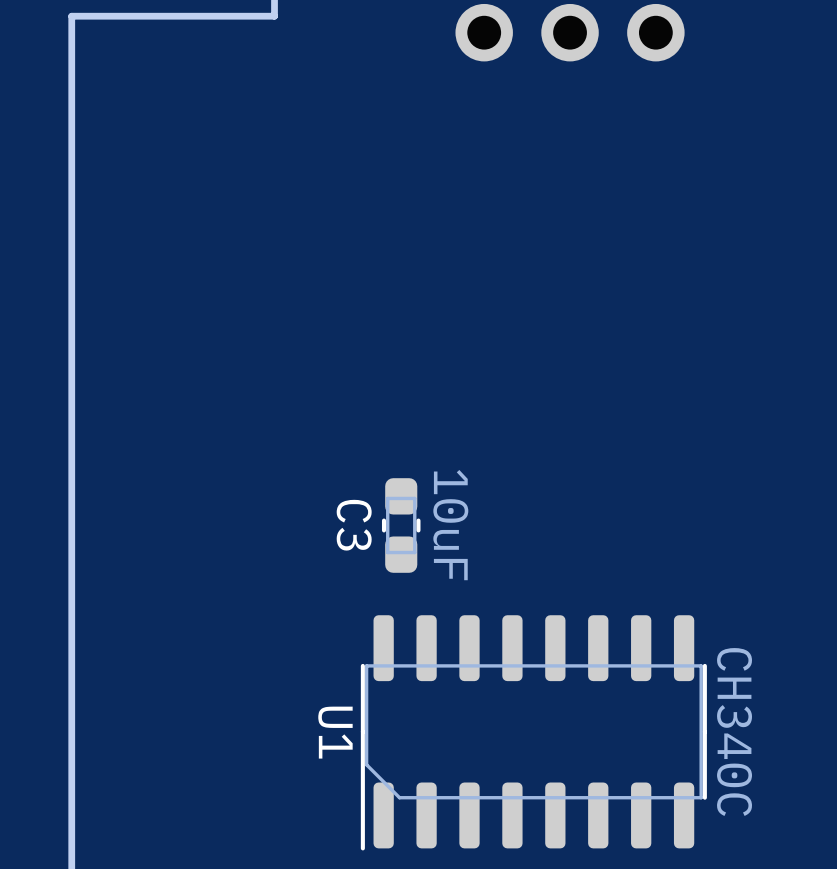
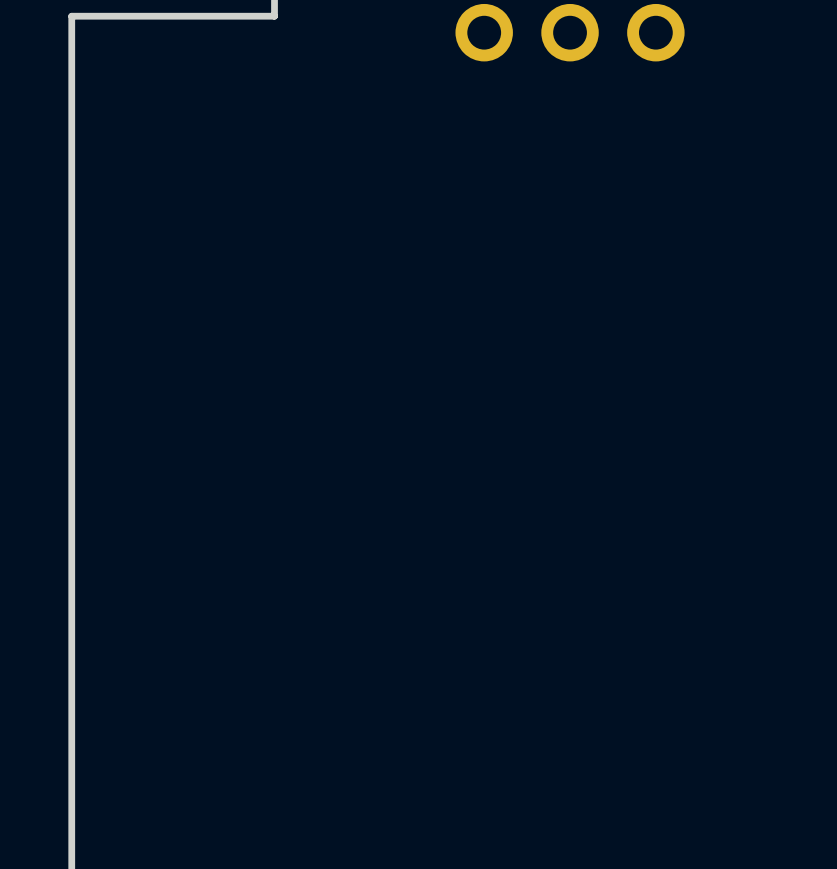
C3: 10uF (401, 525) -> none
U1: CH340C (533, 732) -> none

